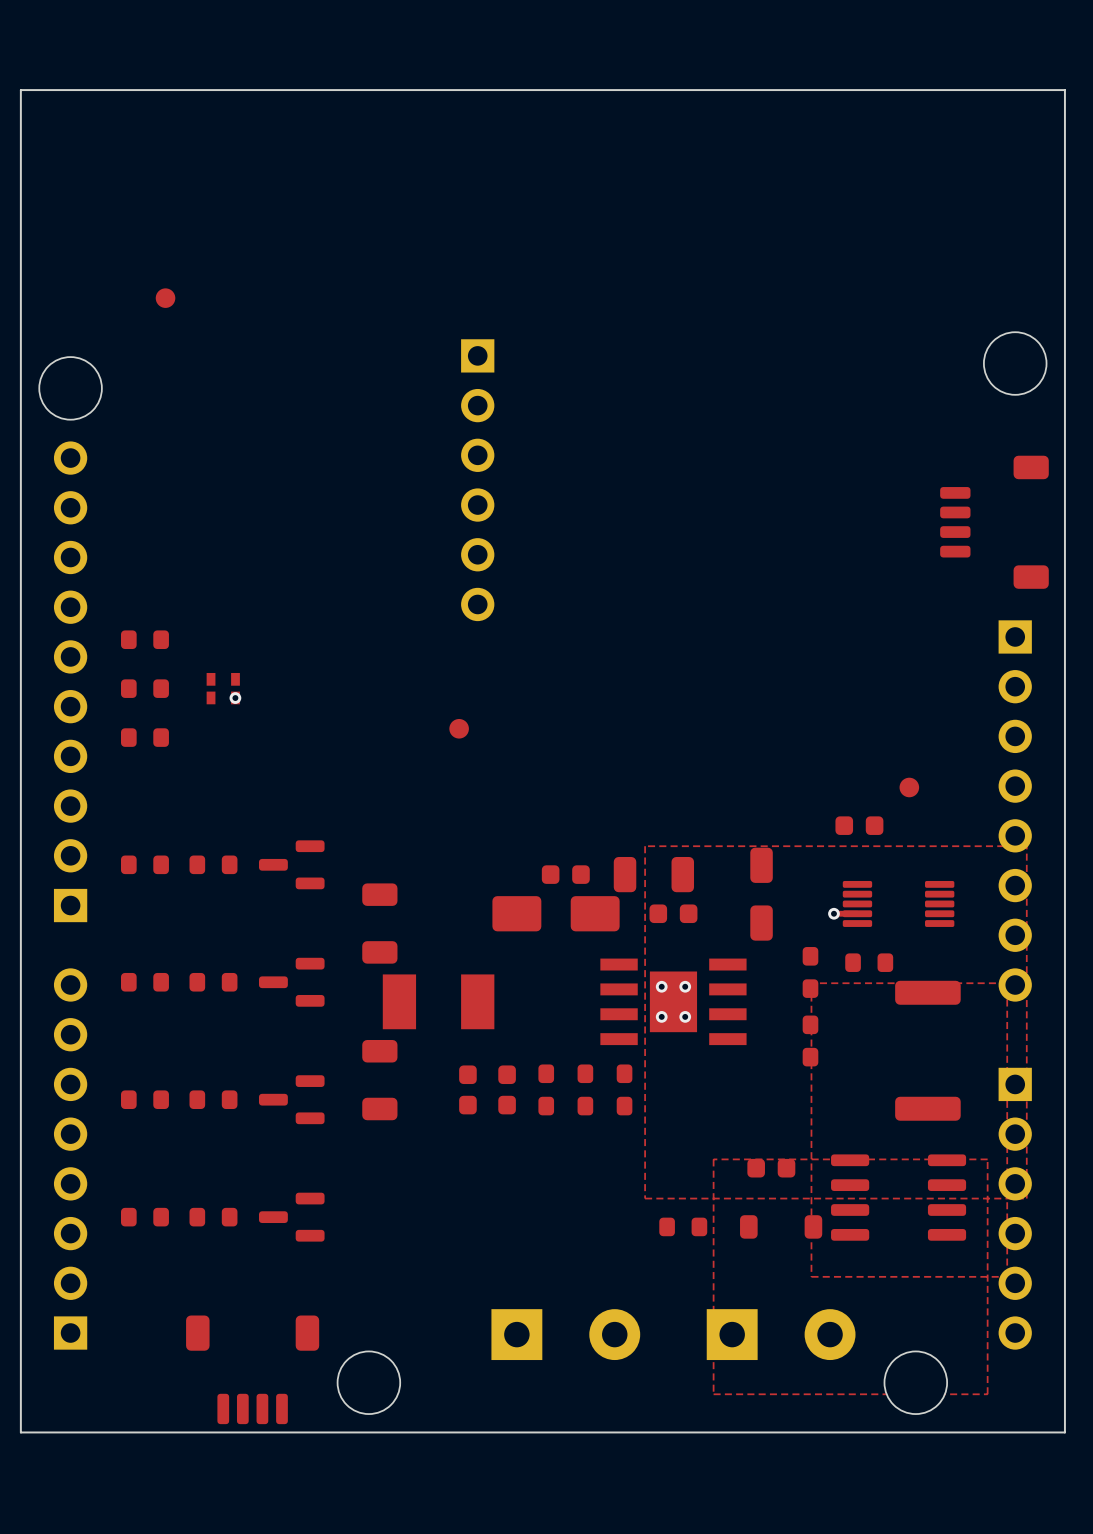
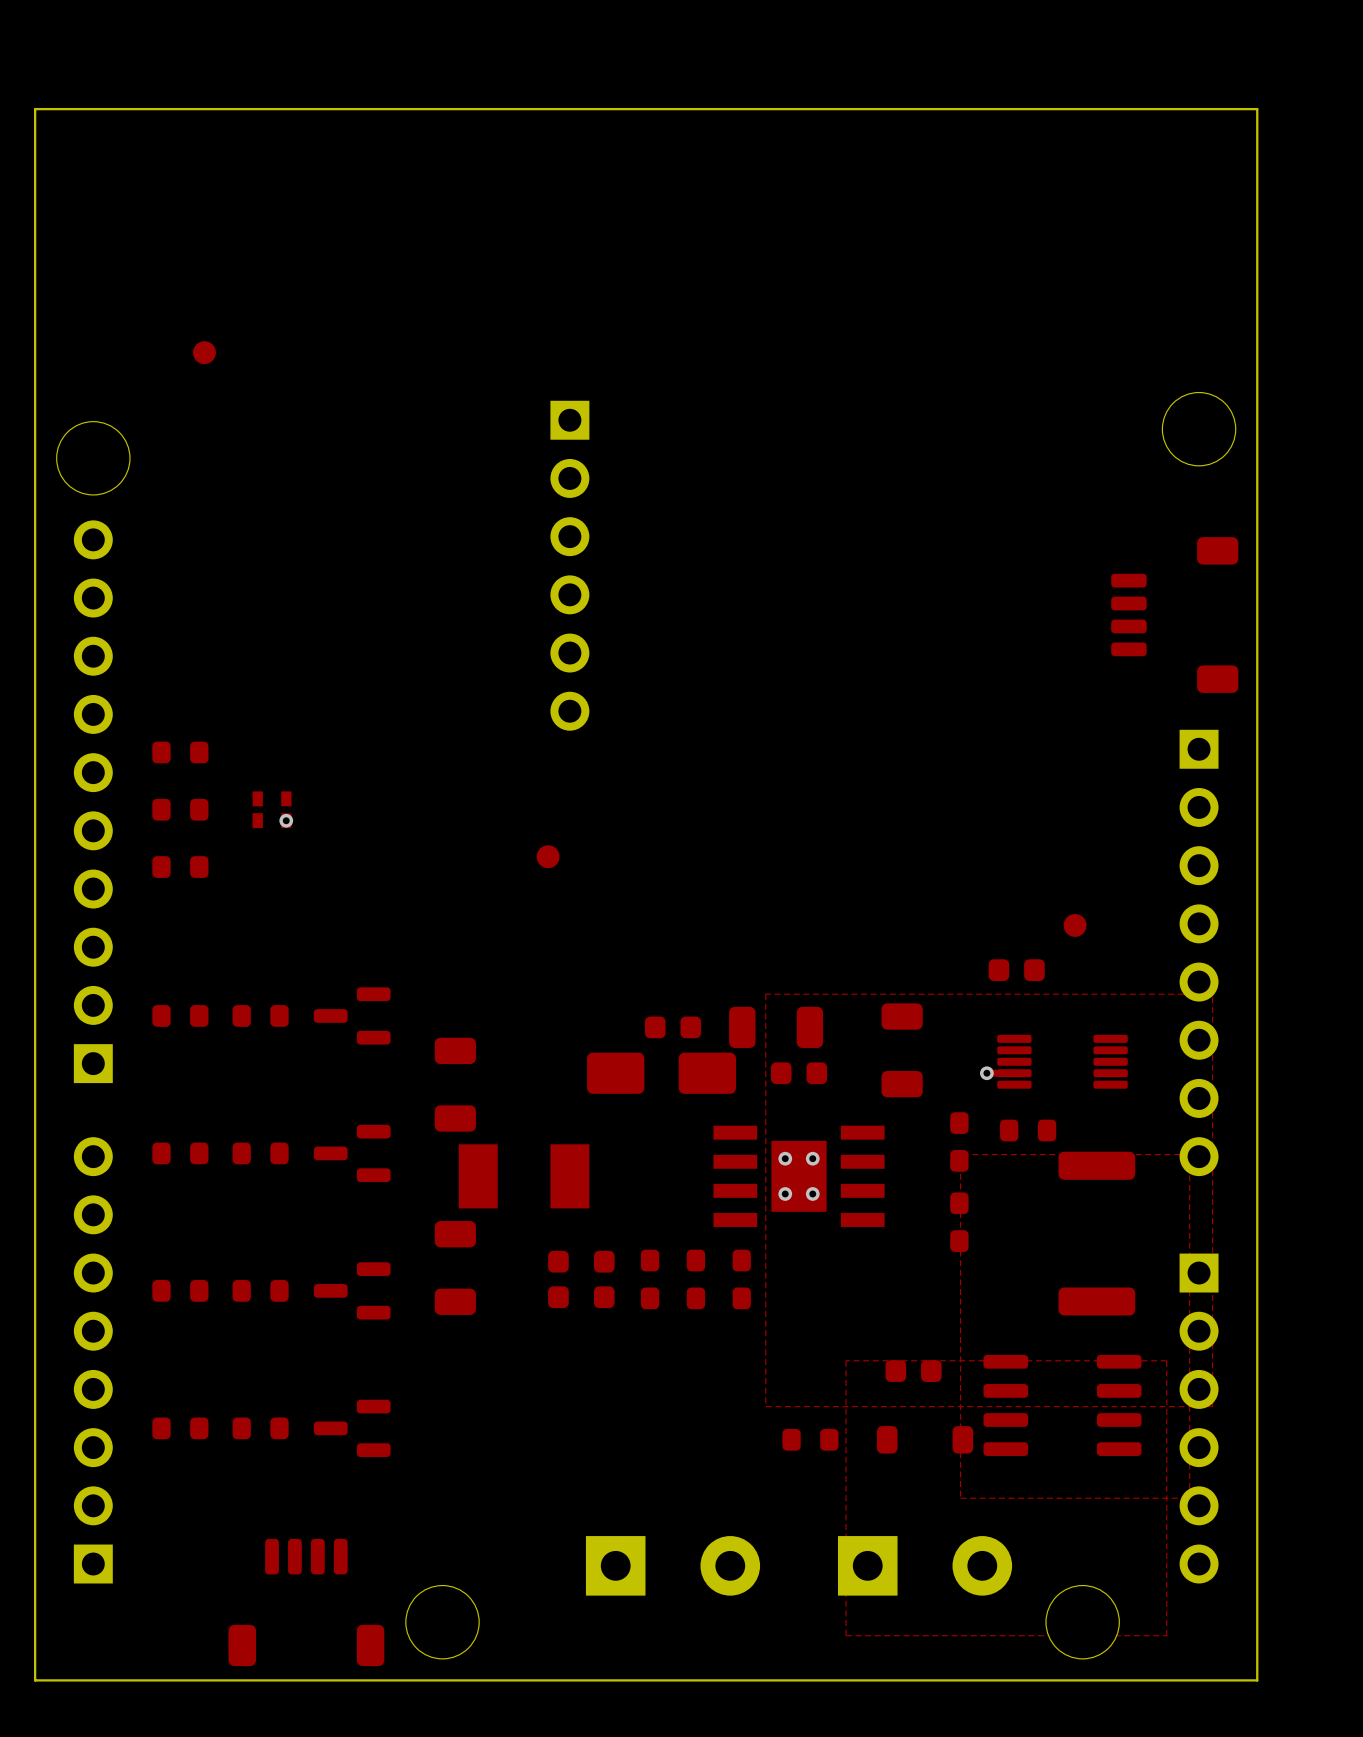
part footprint: [750, 847, 773, 941] -> [881, 1003, 923, 1098]
part rotation: 0° (252, 1369) -> 180° (306, 1602)

